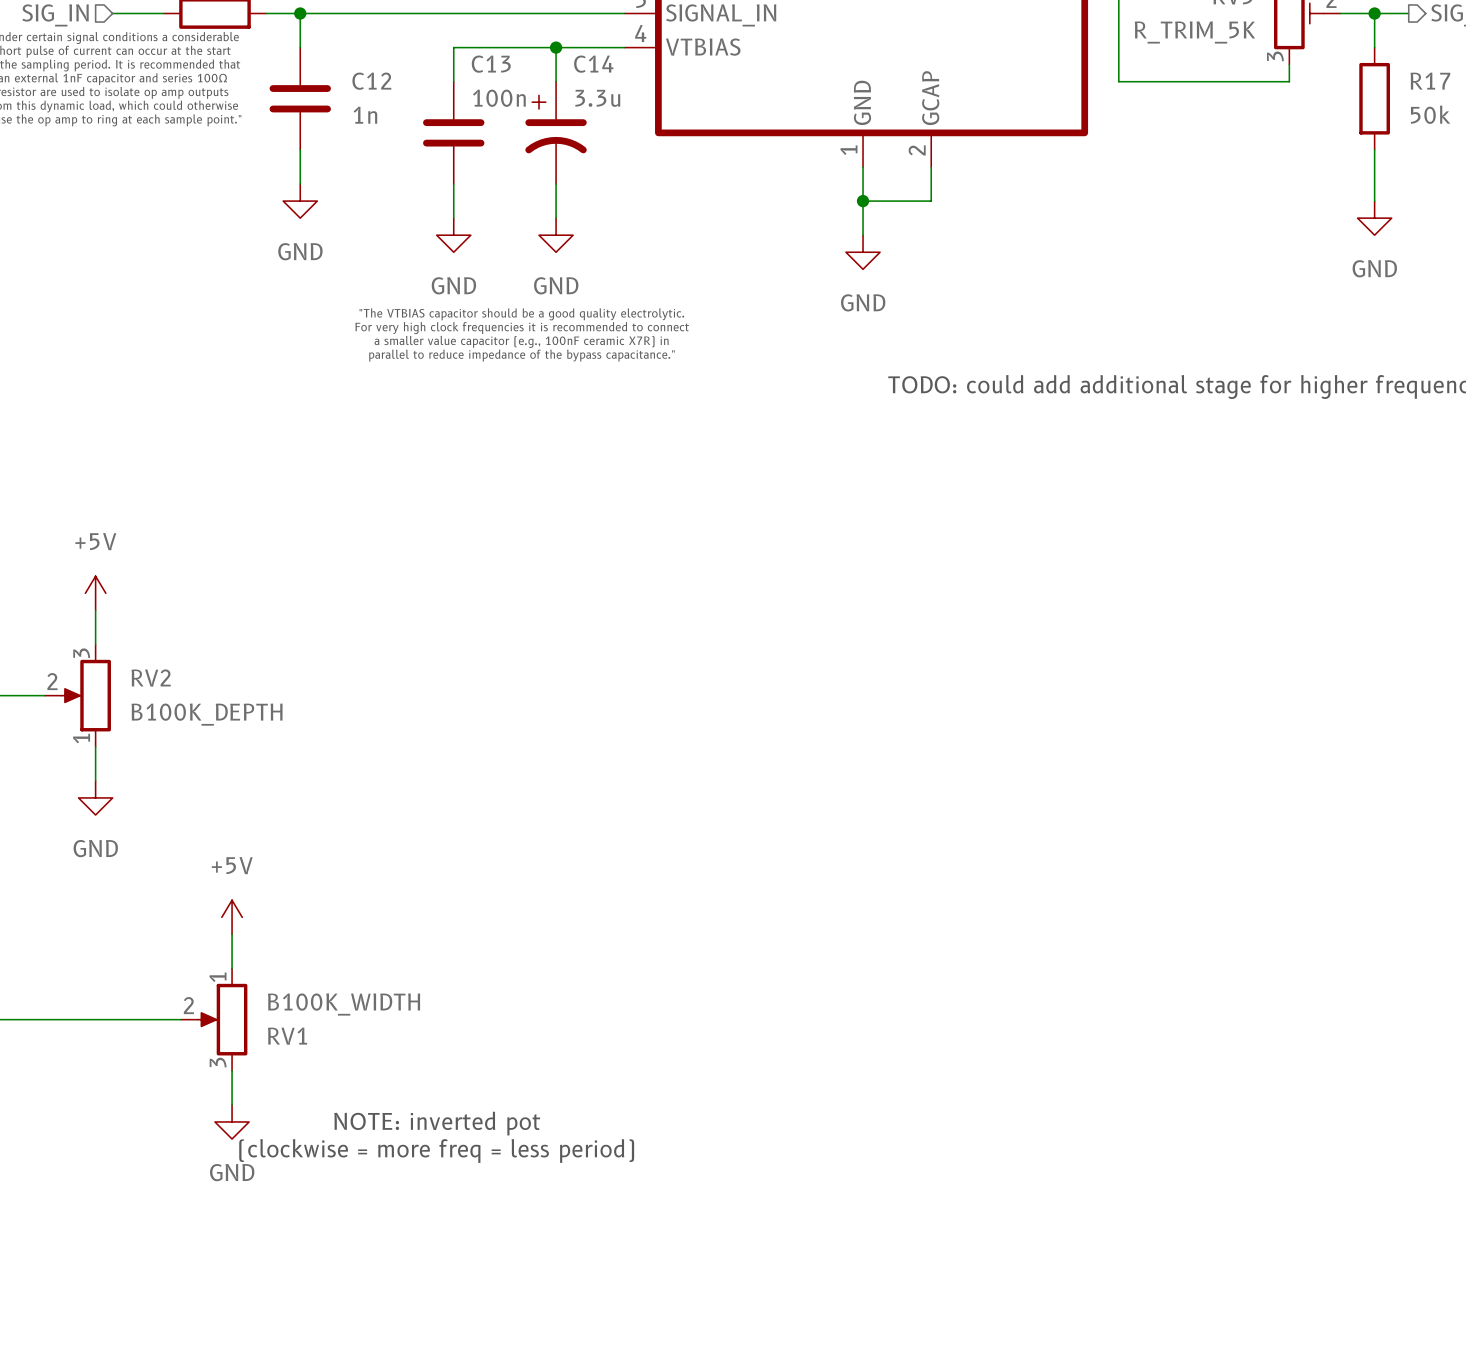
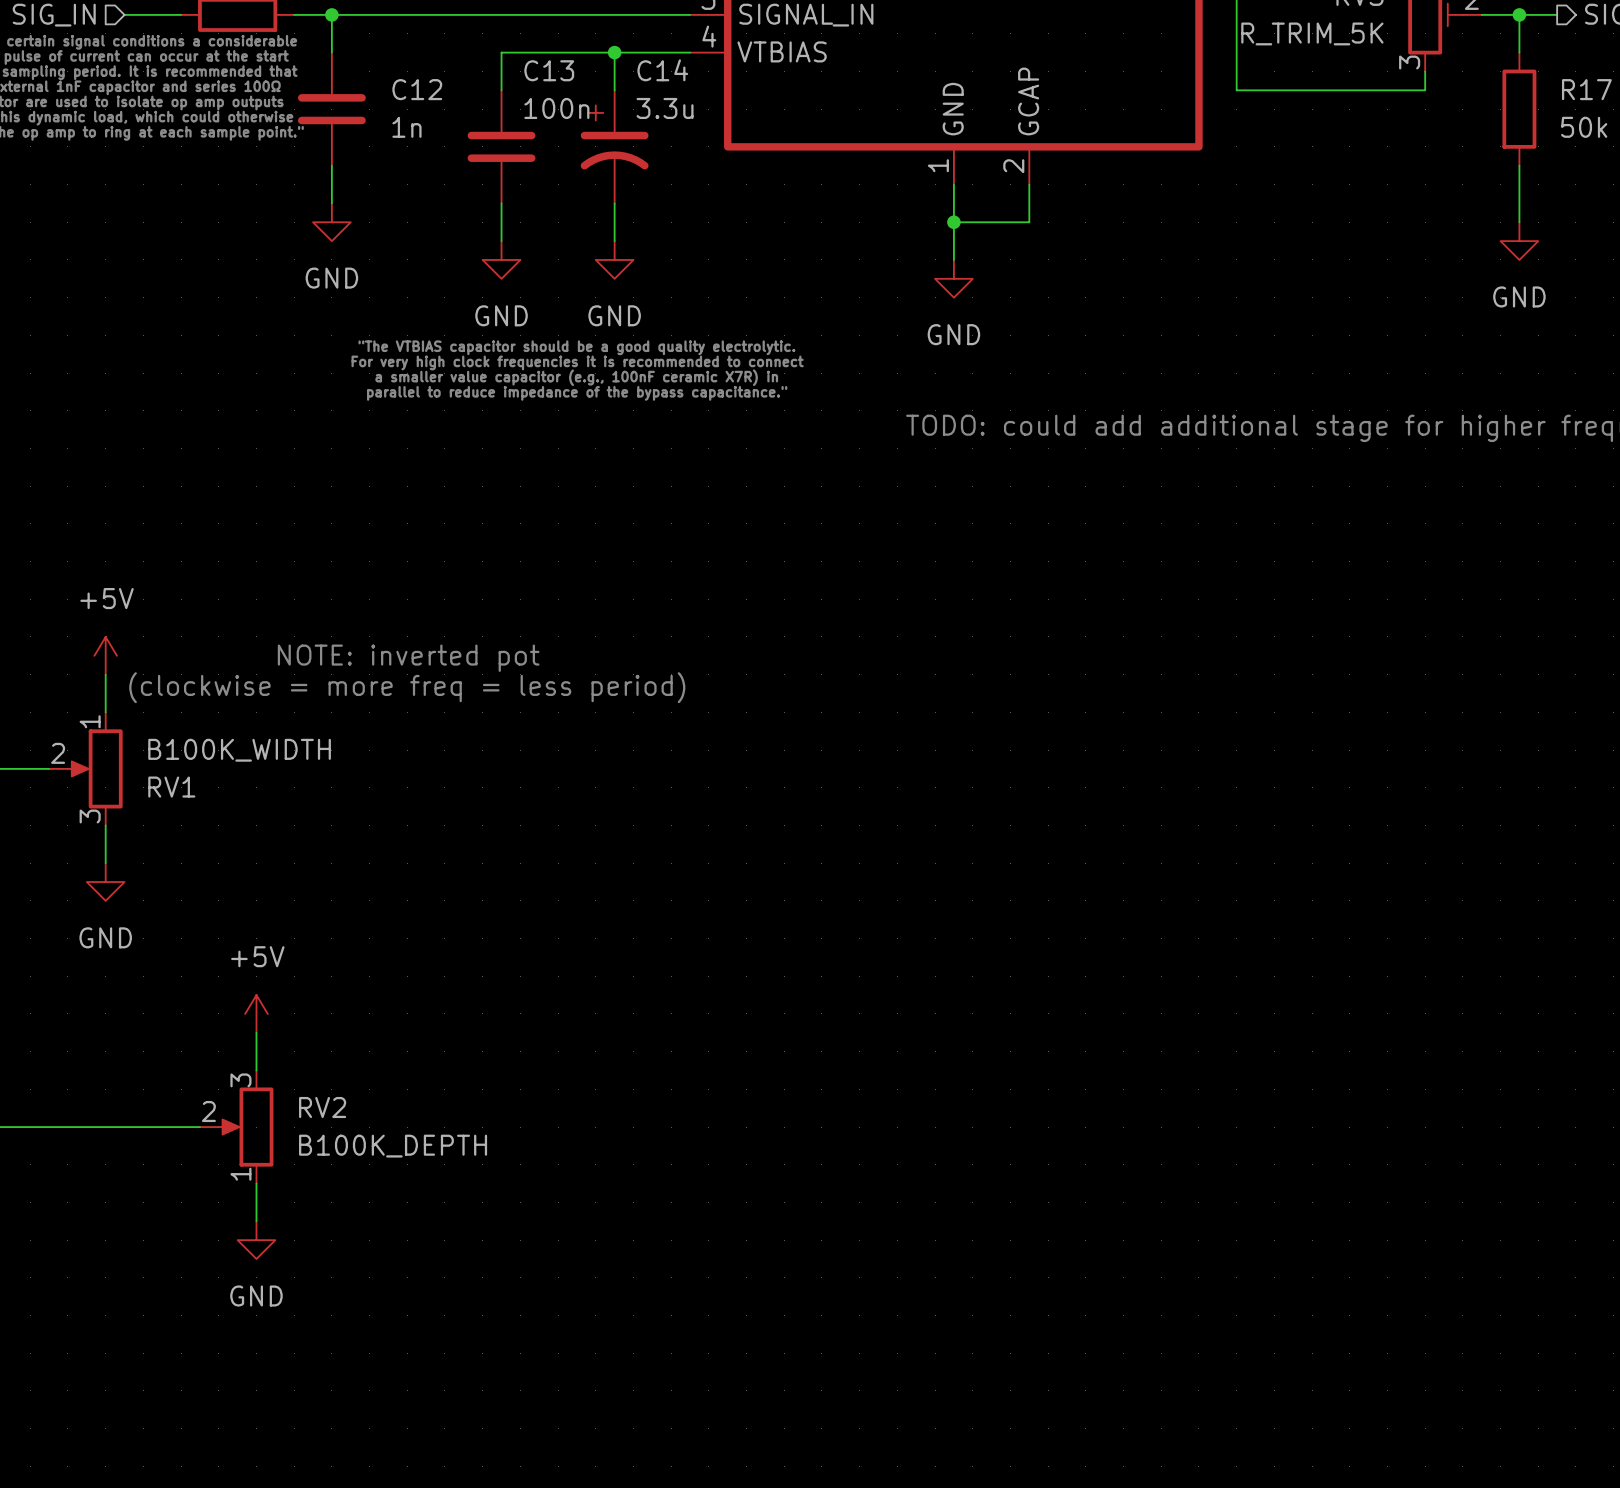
text: none -> NOTE: inverted pot (408, 658)
text: none -> (clockwise = more freq = less period) (407, 687)
RV2 position: (77, 695) -> (236, 1127)
RV1 position: (214, 1019) -> (85, 768)
text: NOTE: inverted pot (437, 1123) -> none
text: (clockwise = more freq = less period) (436, 1151) -> none

